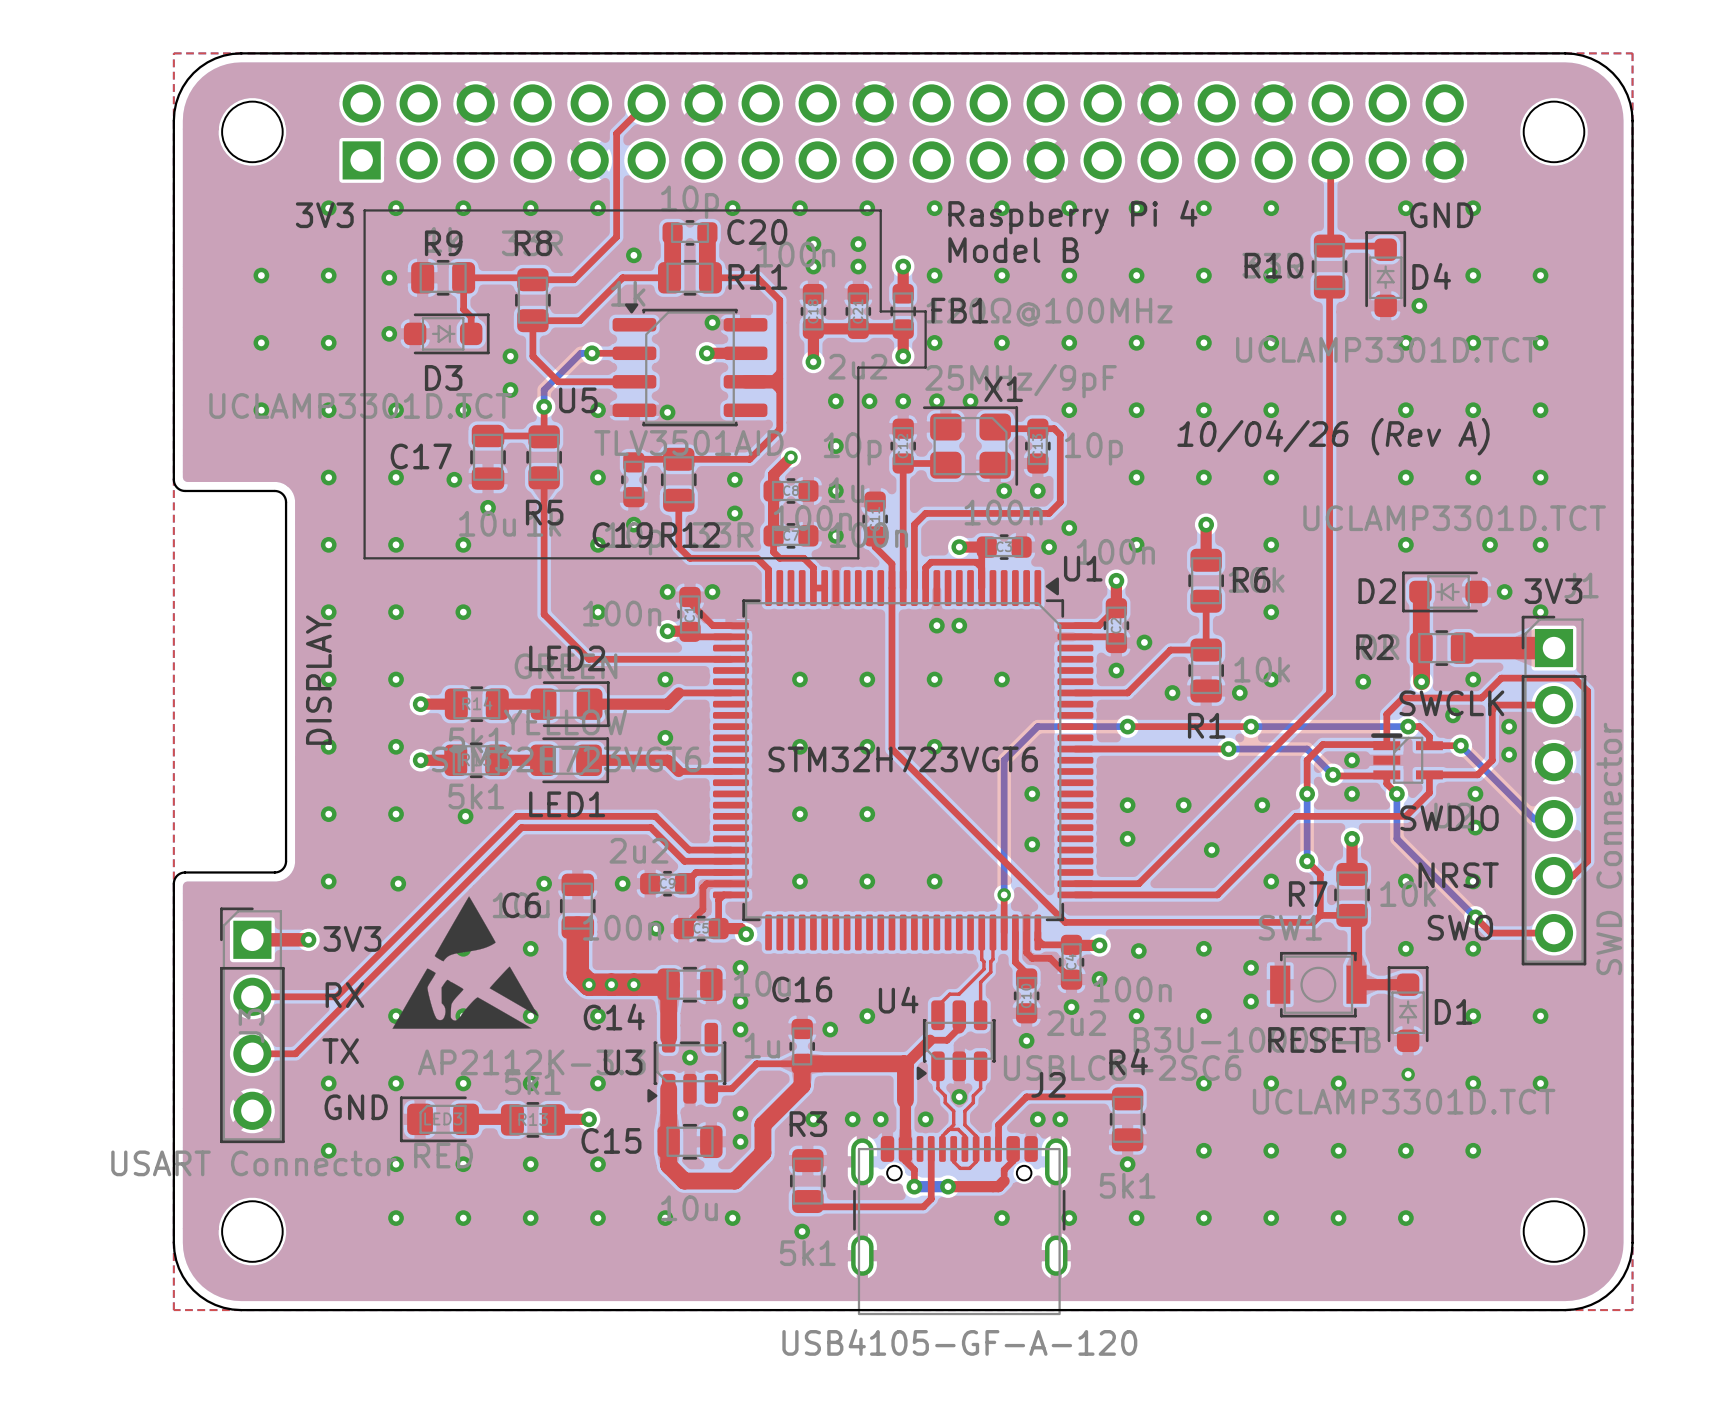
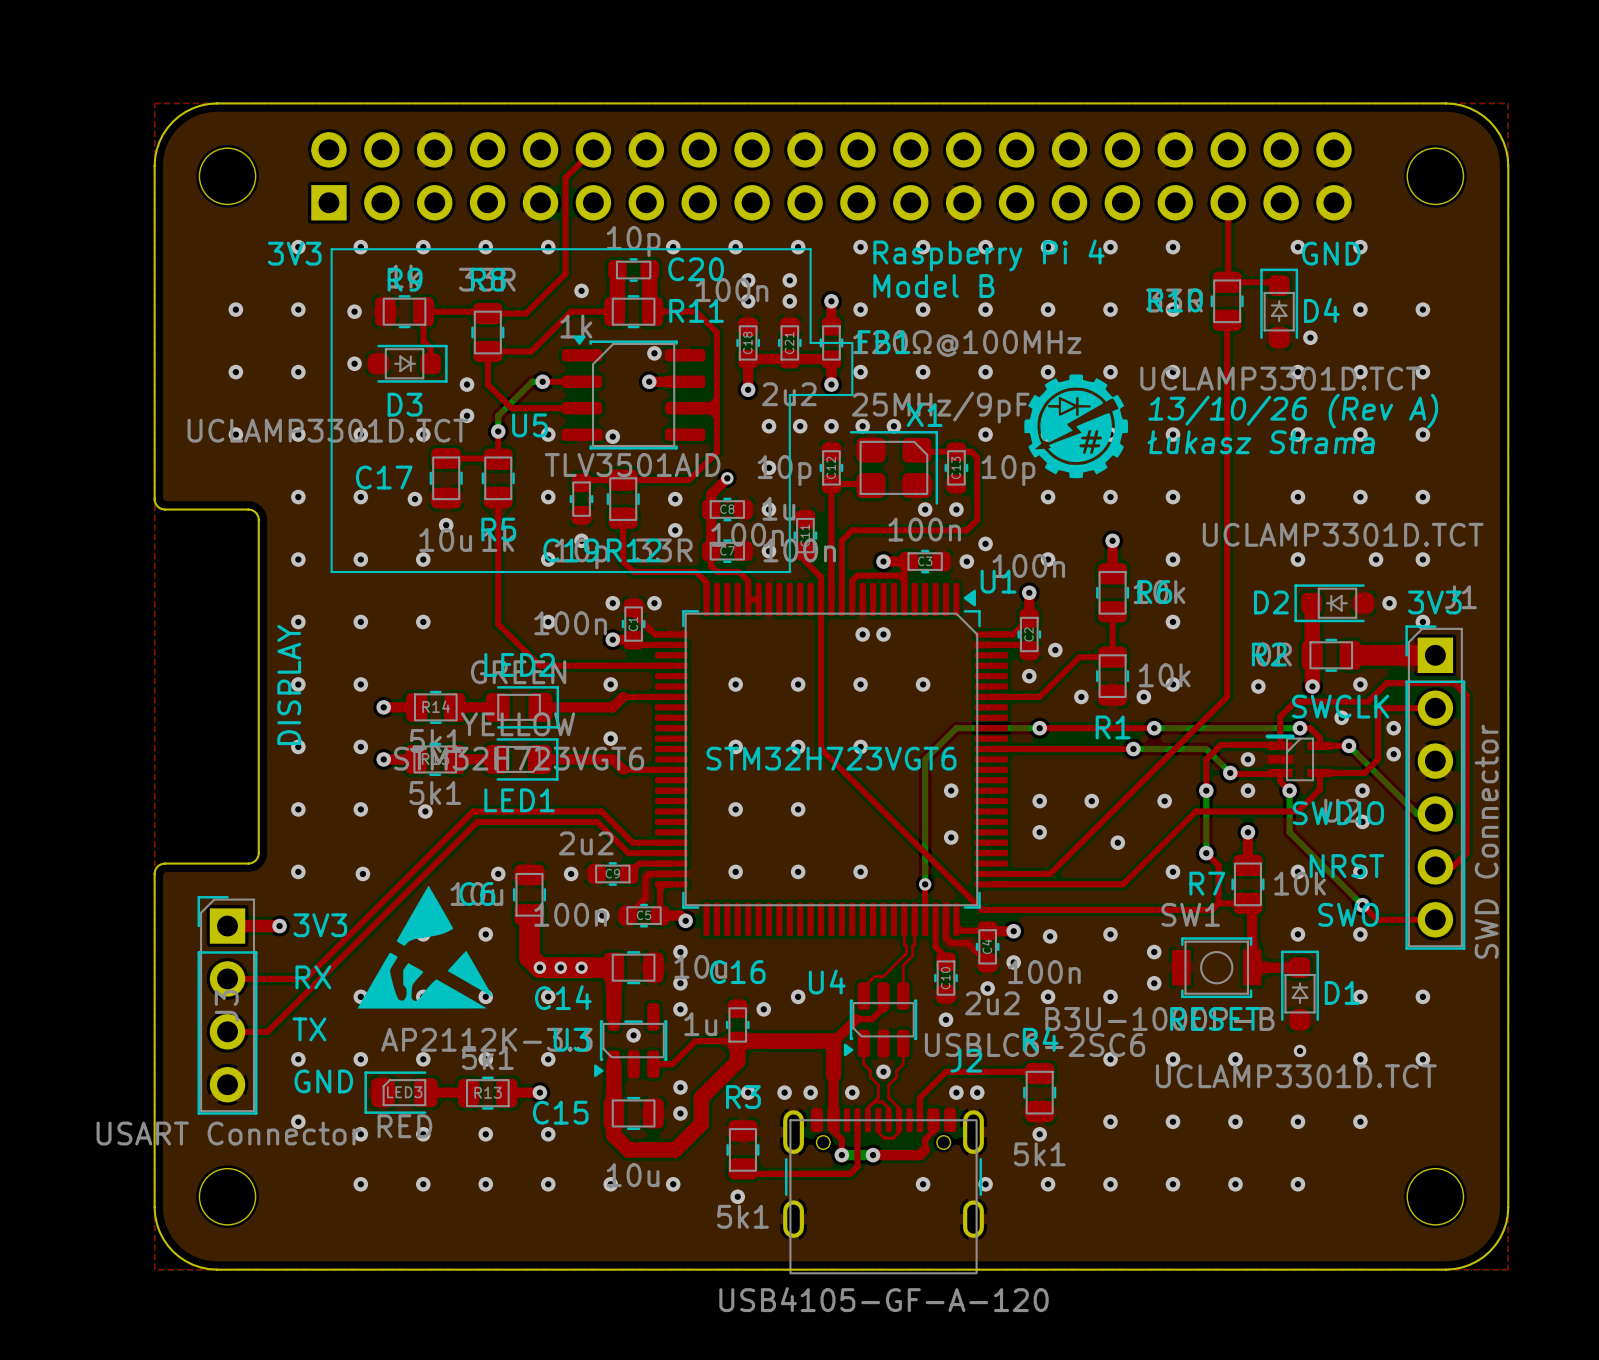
drawing: none -> [1024, 374, 1129, 479]
text: none -> 13/10/26 (Rev A) (1293, 411)
text: none -> Łukasz Strama (1261, 442)
text: 10/04/26 (Rev A) (1333, 436) -> none

